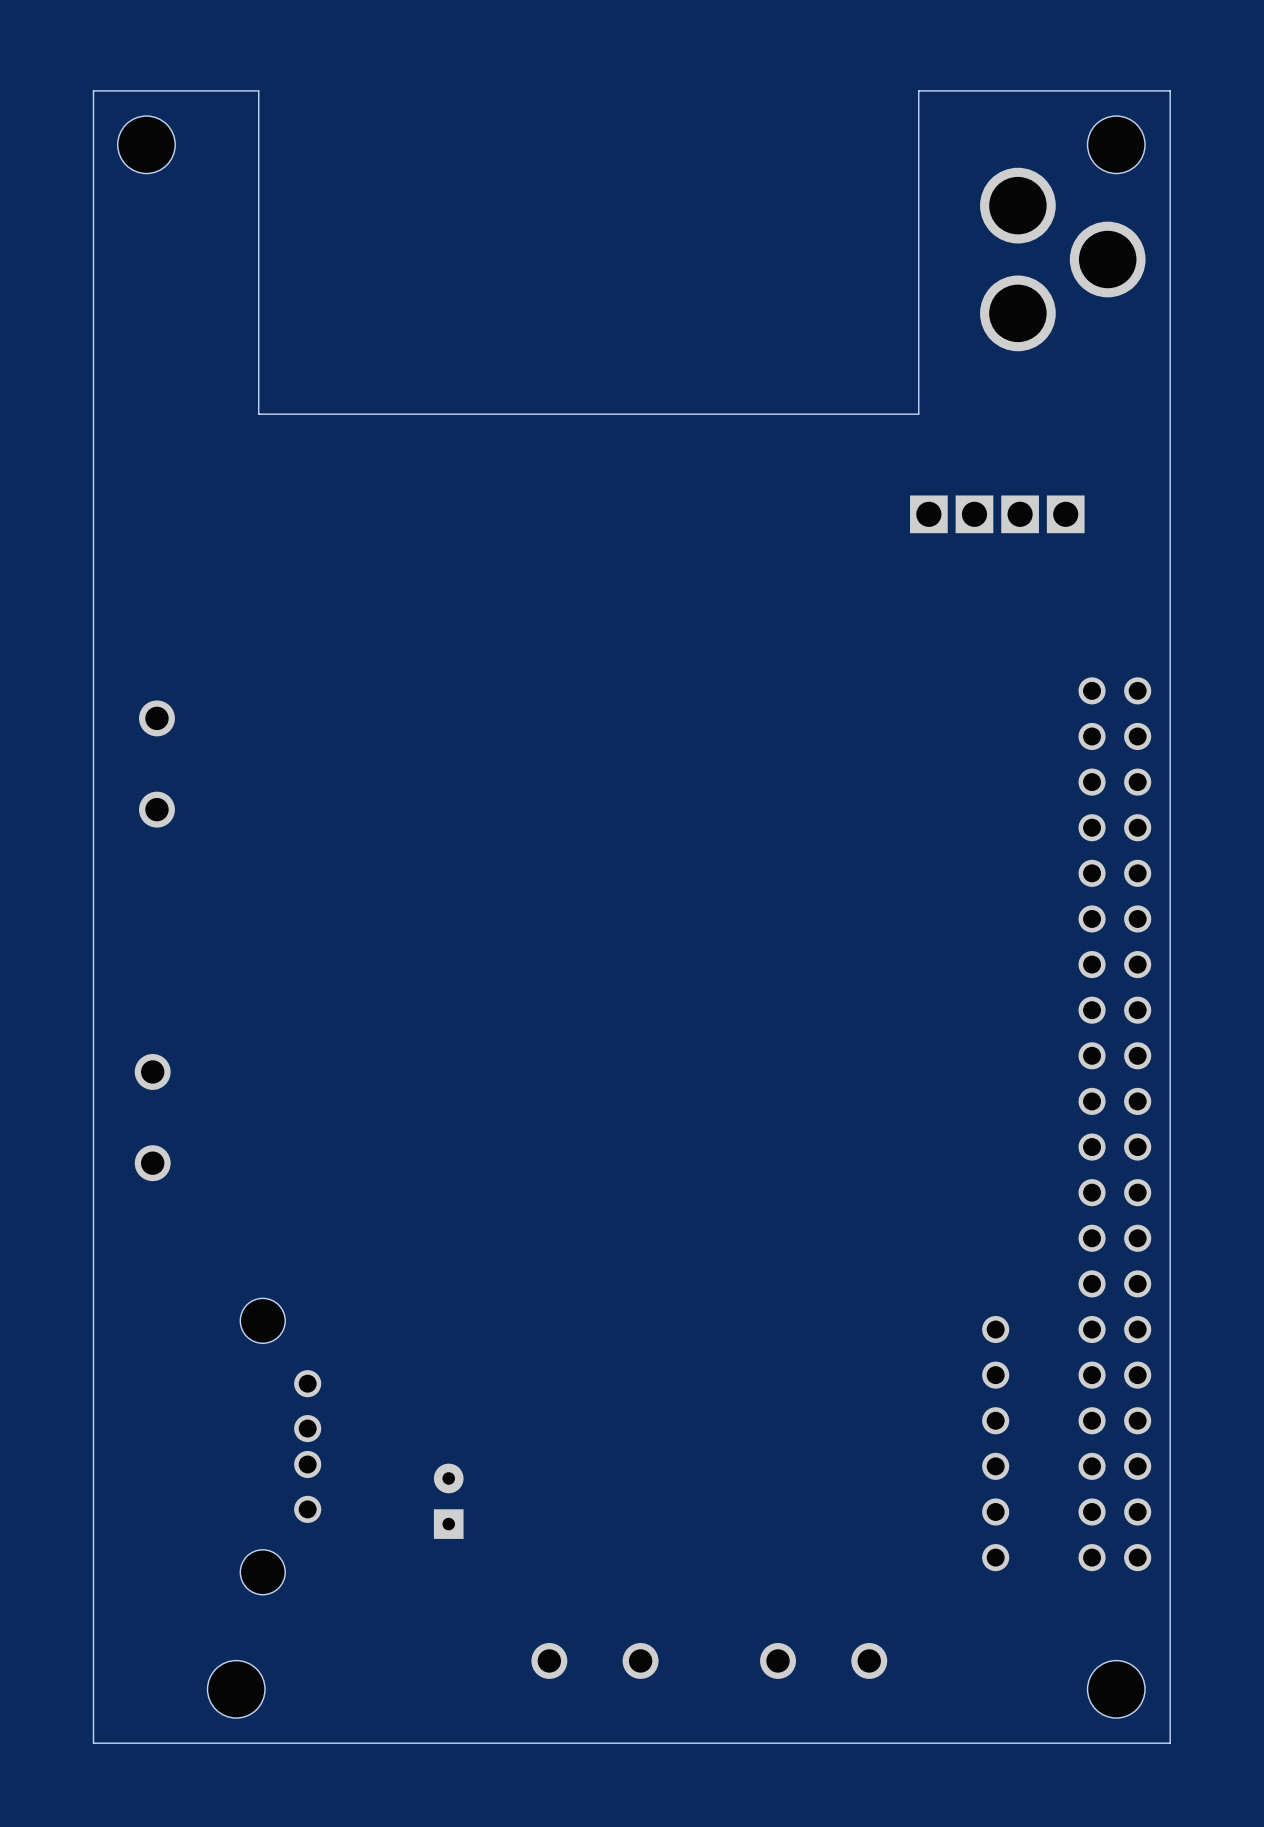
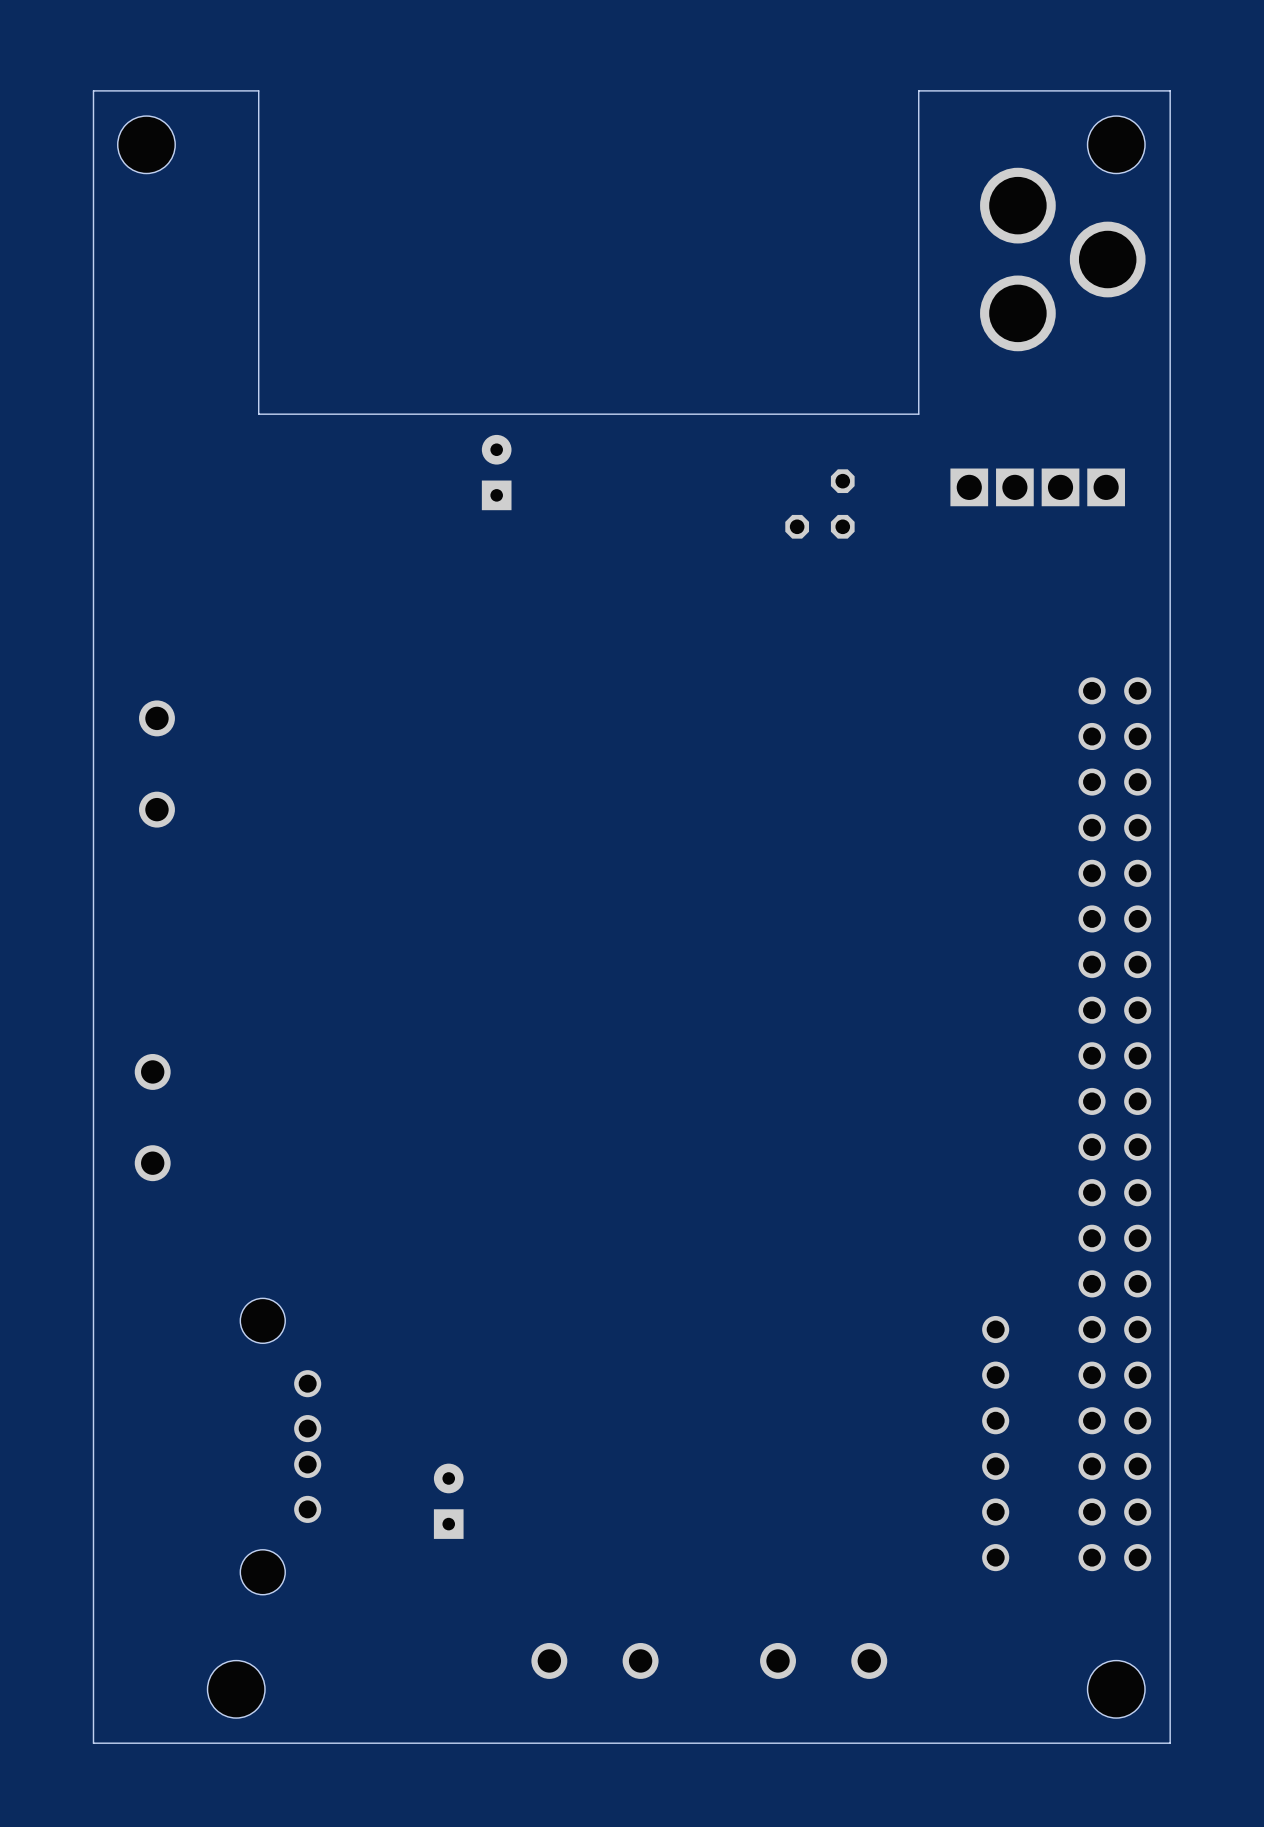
part: none -> (496, 472)
part: none -> (819, 503)
part position: (997, 514) -> (1037, 487)

